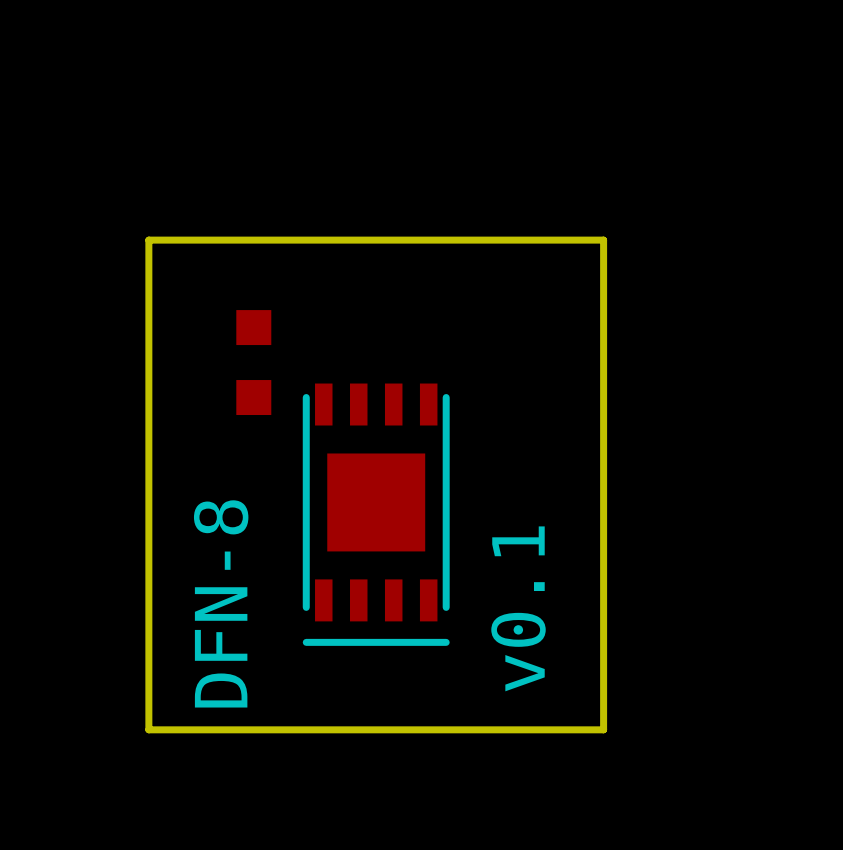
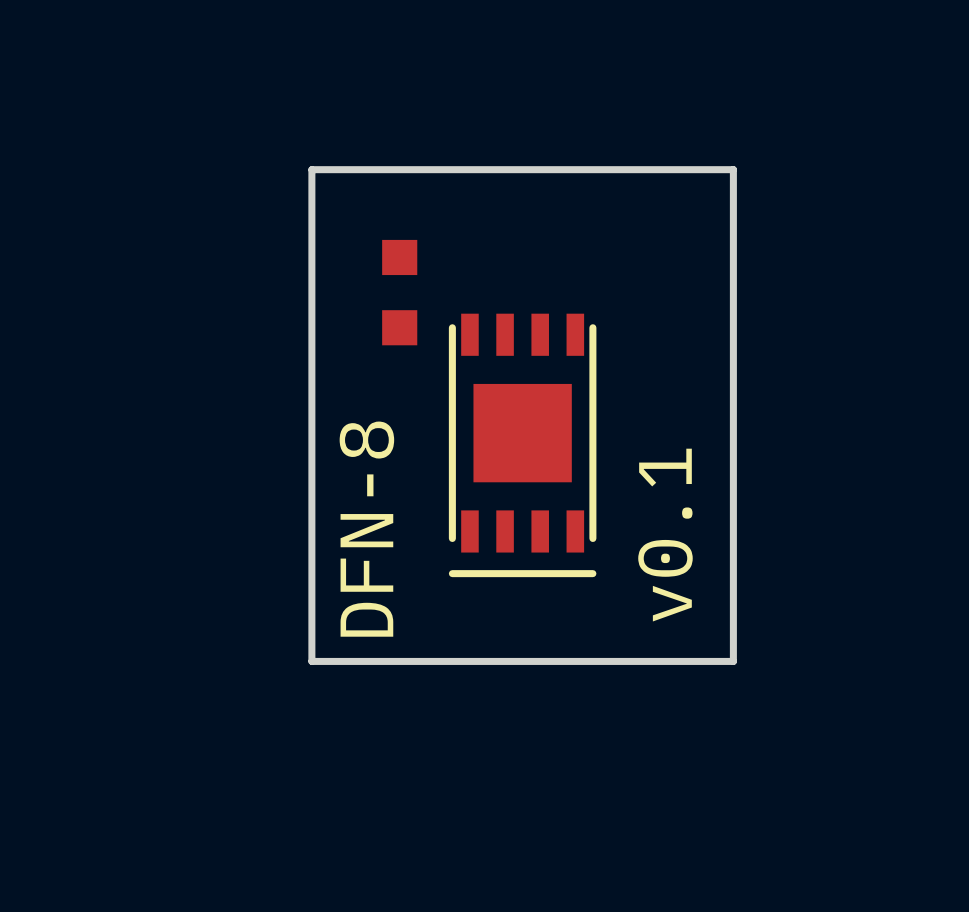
board edge: (166, 240) (148, 240) (148, 729) (166, 729) -> (311, 169) (311, 661)
board edge: (586, 240) (603, 240) (603, 729) (586, 729) -> (733, 169) (733, 661)

